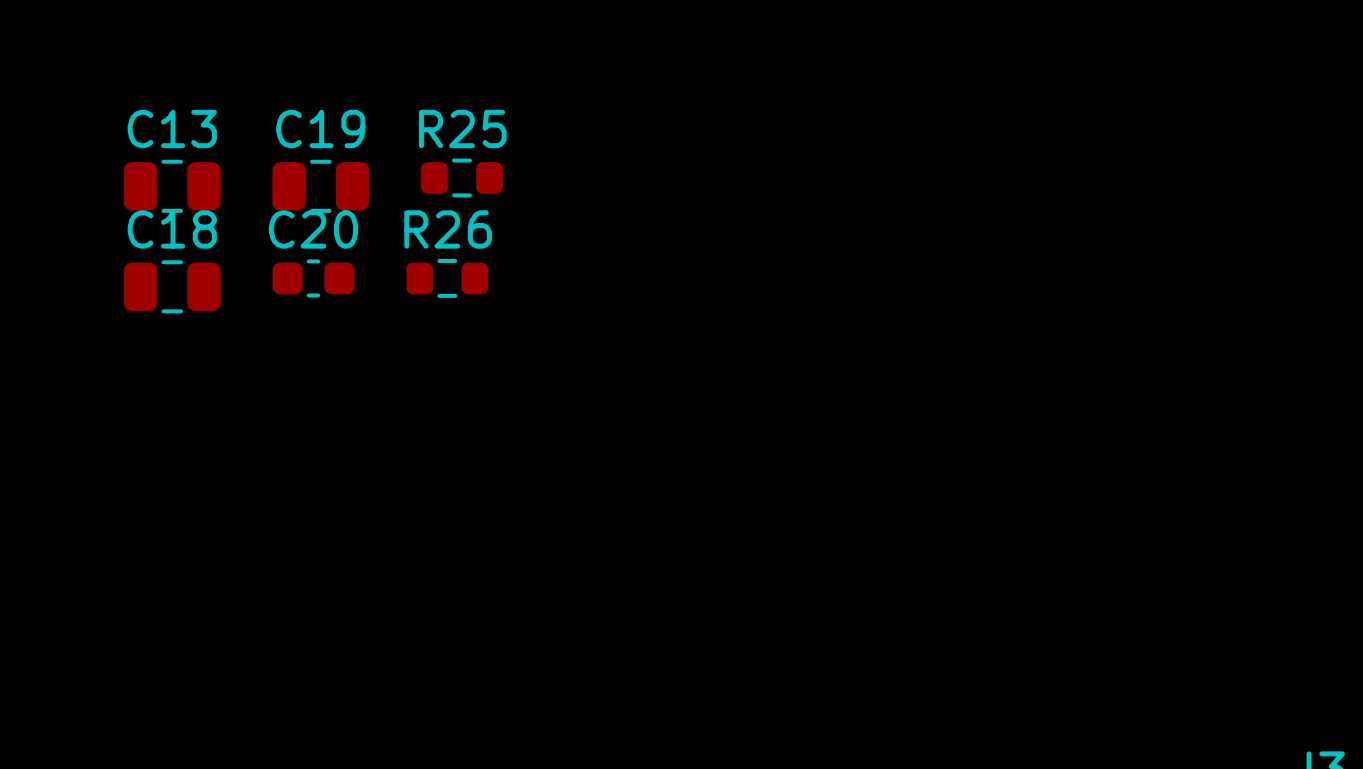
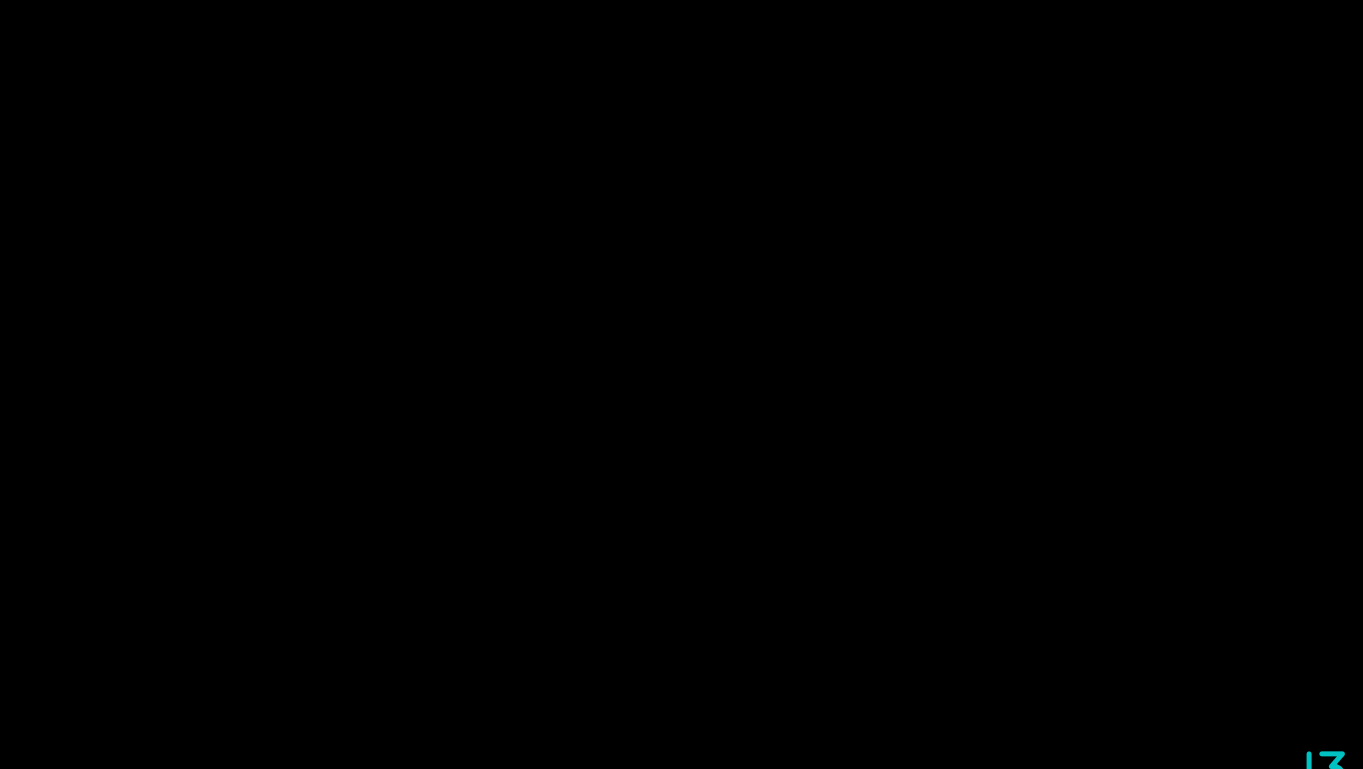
R25: (462, 177) -> none
C13: (172, 186) -> none
C19: (320, 186) -> none
C20: (313, 278) -> none
R26: (447, 278) -> none
C18: (172, 286) -> none

